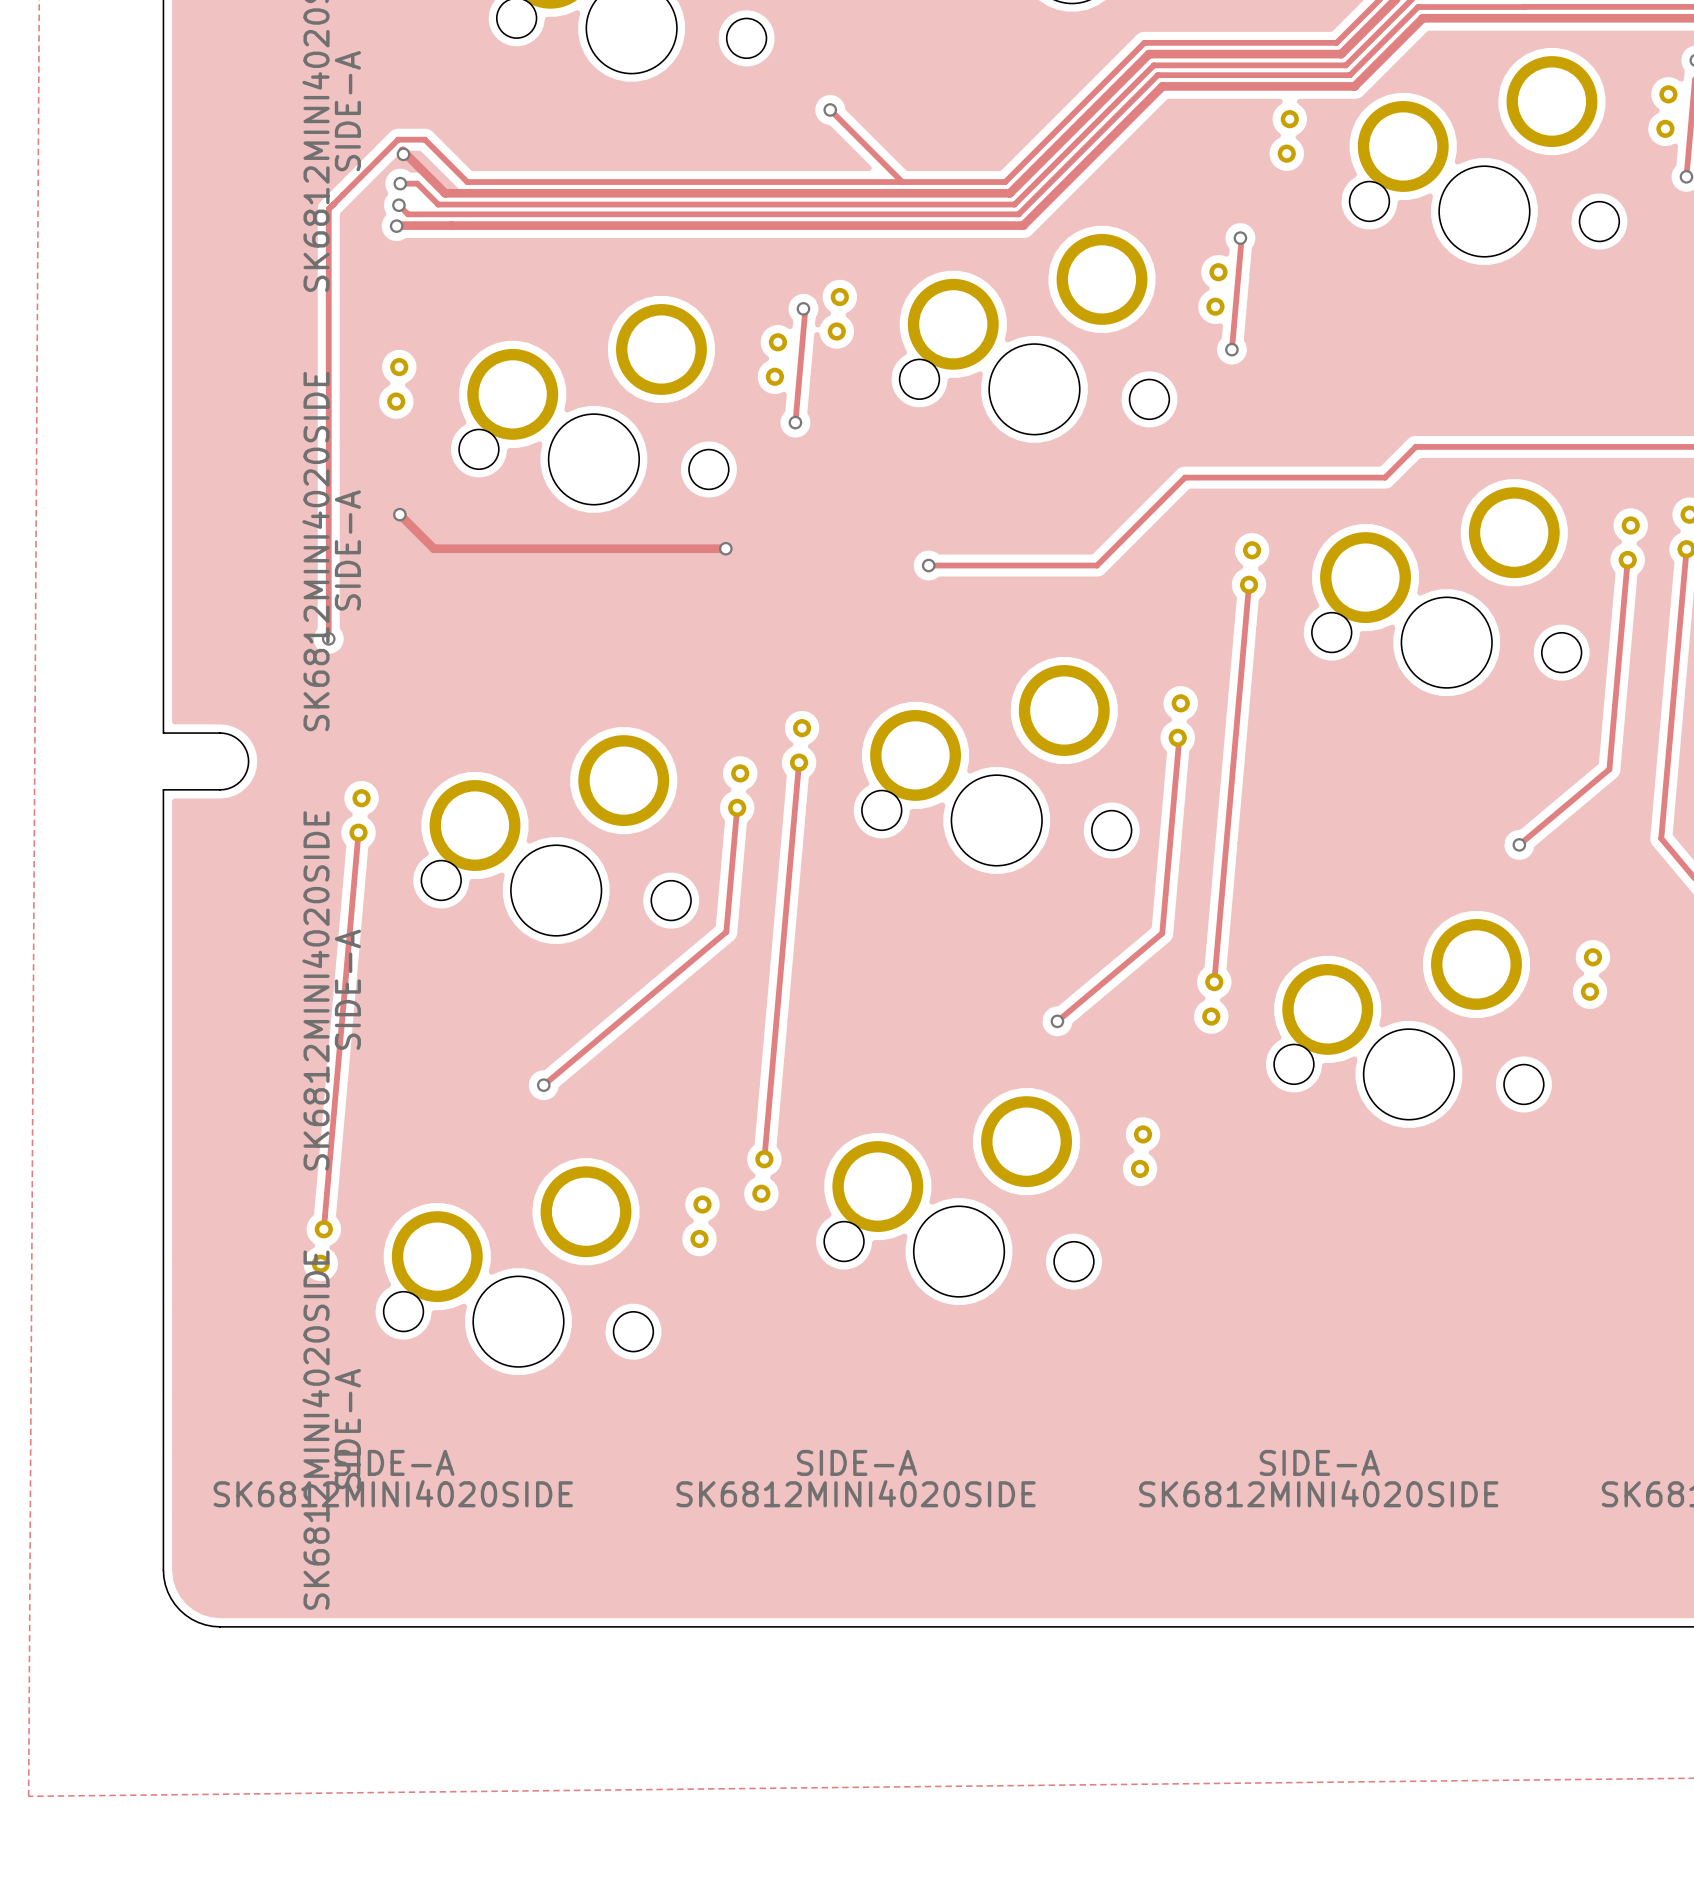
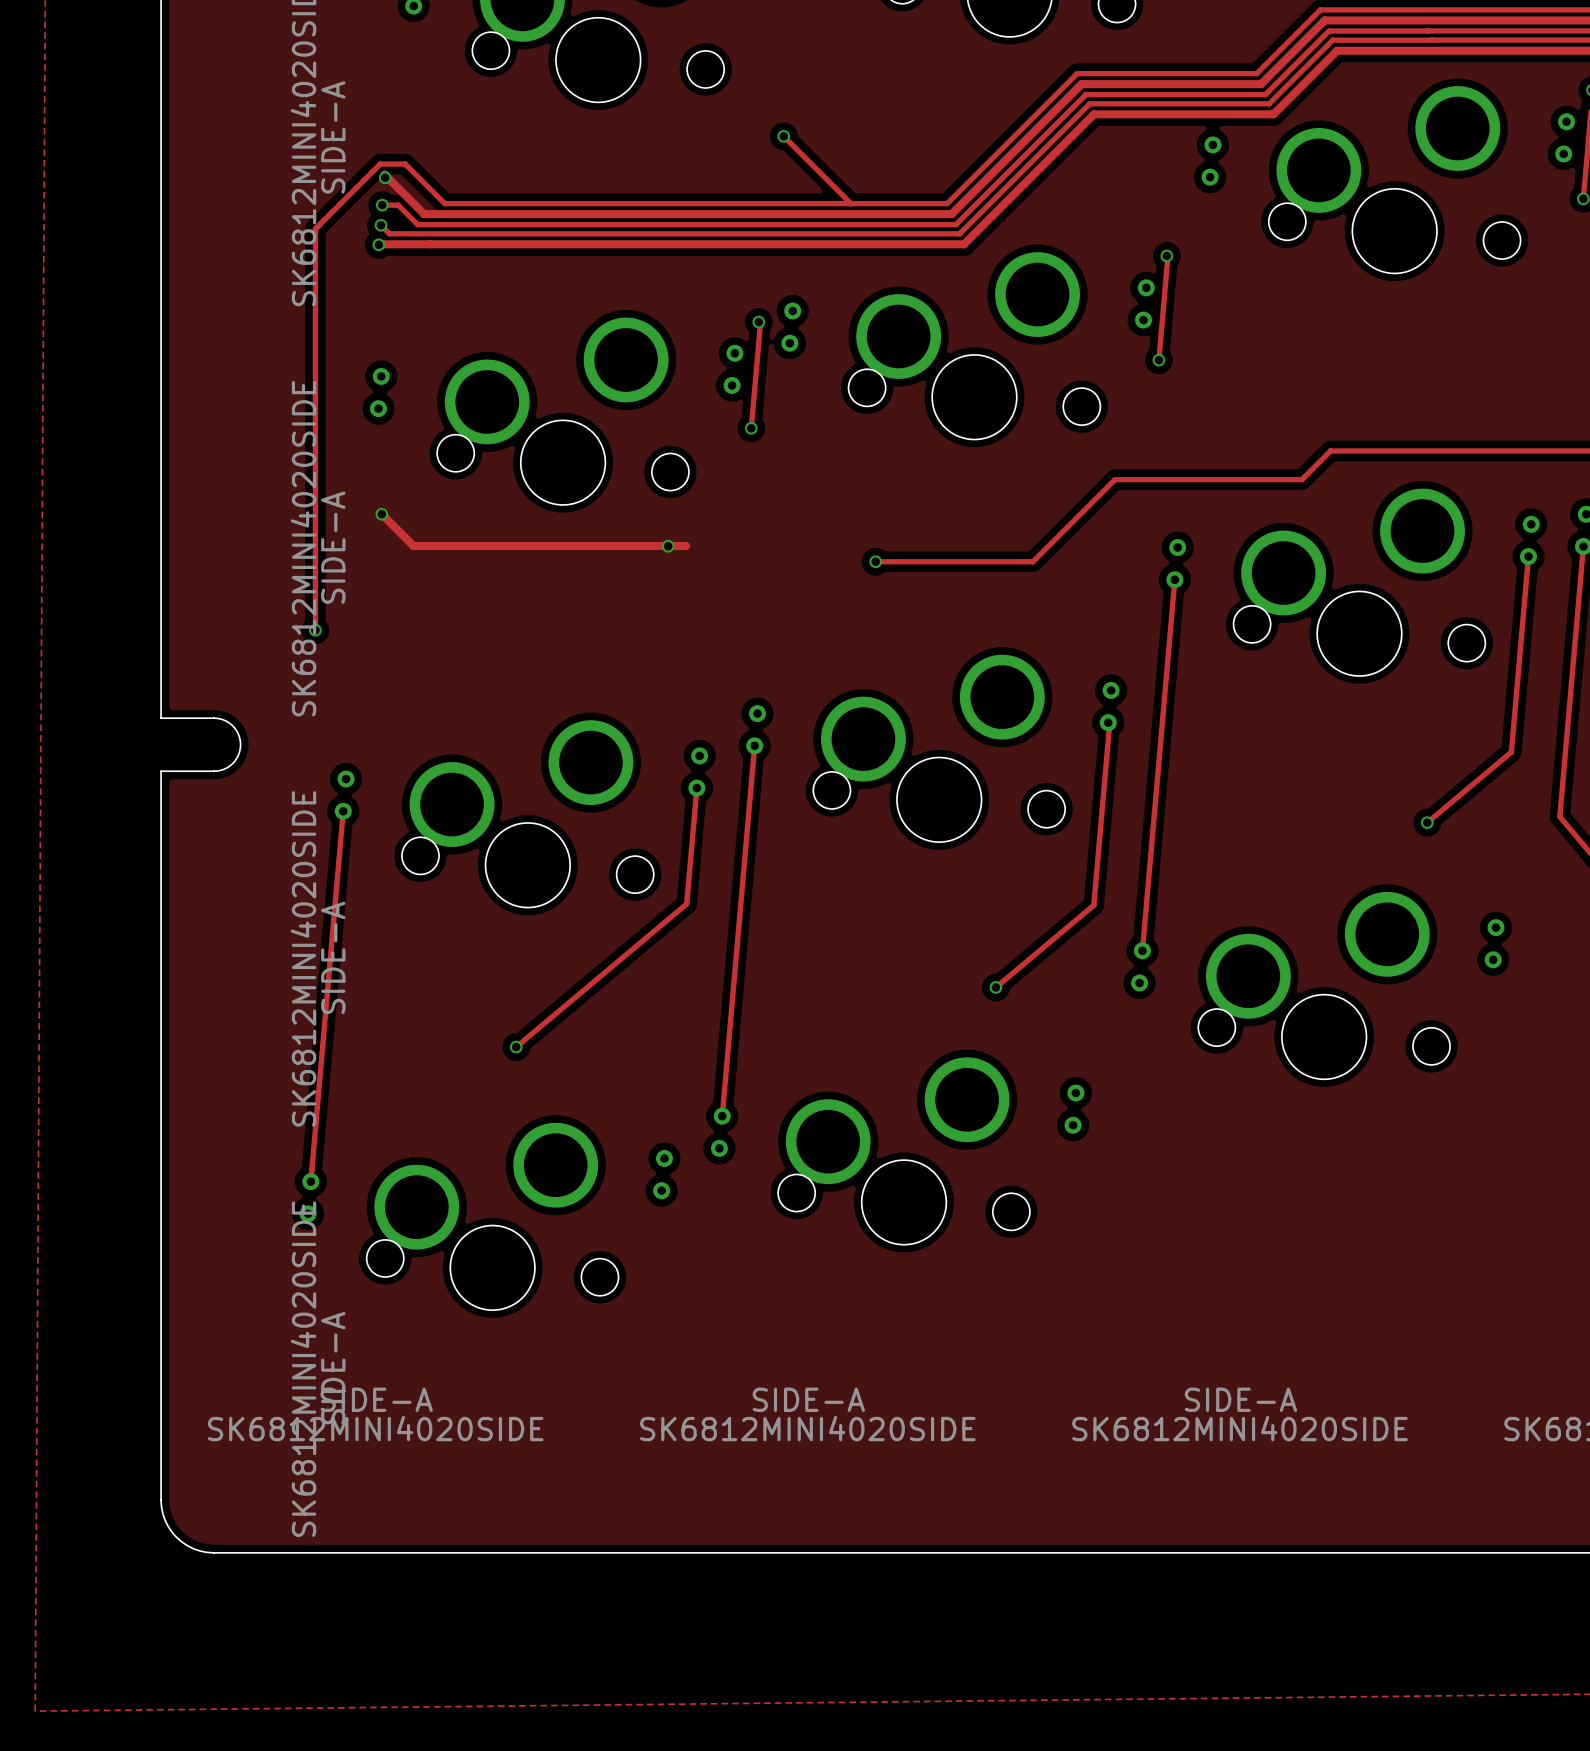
via position: (725, 548) -> (668, 546)

